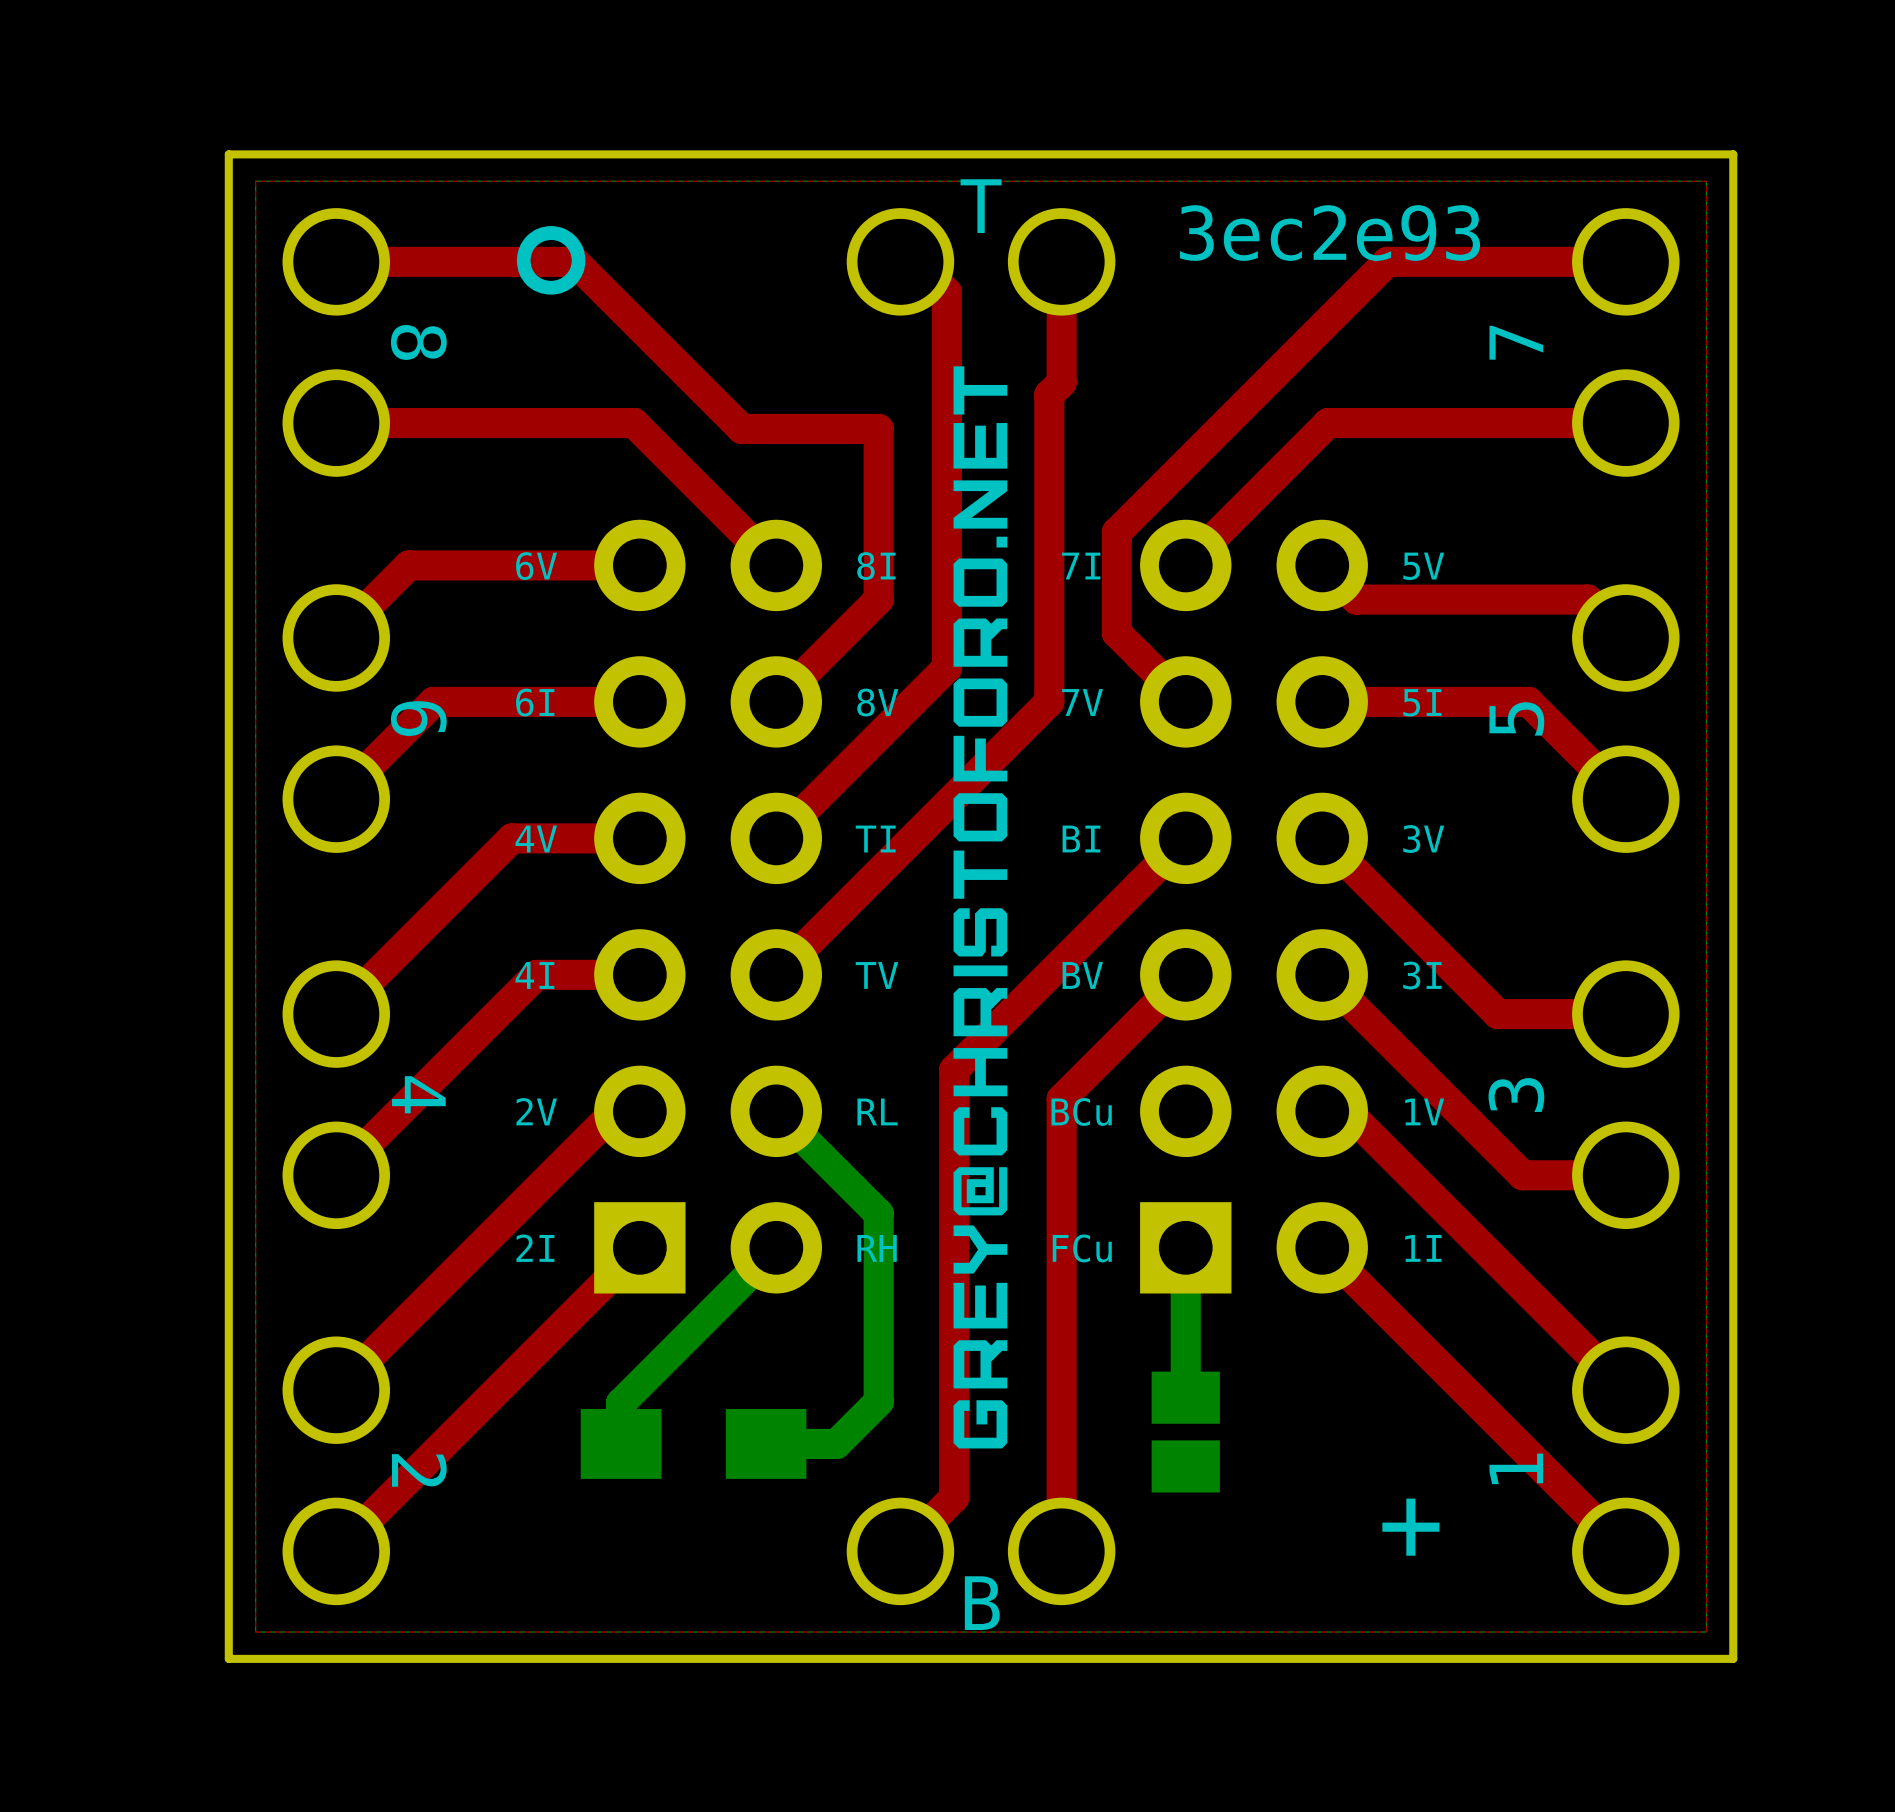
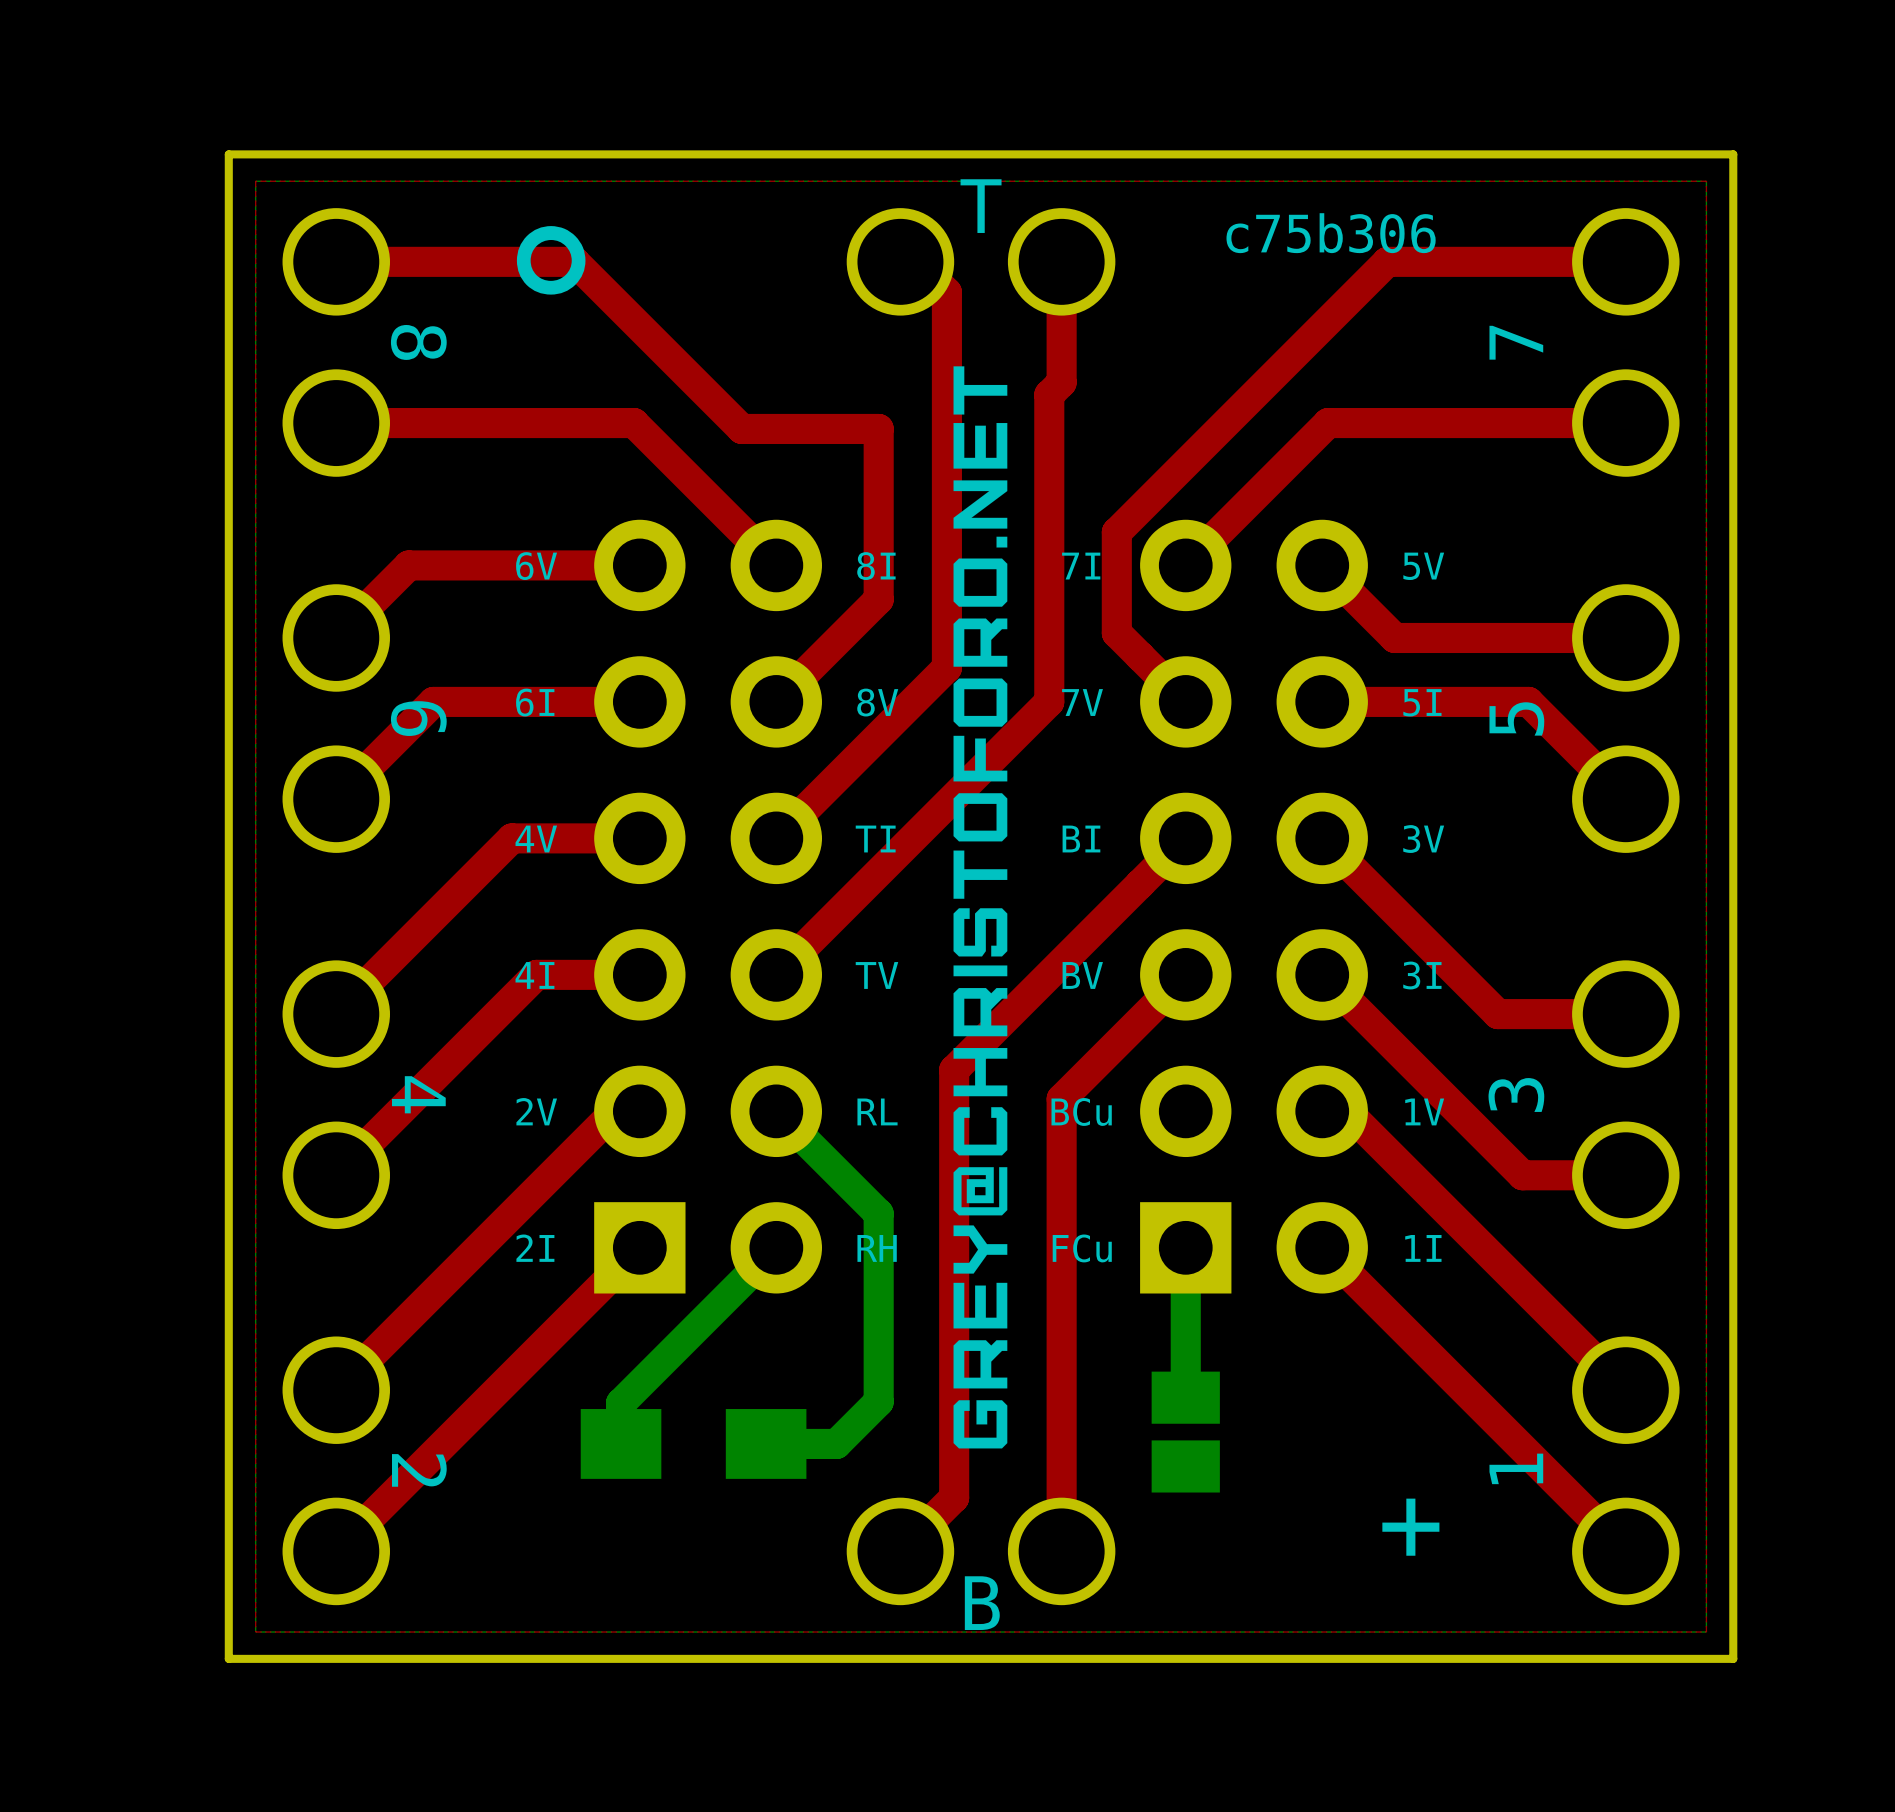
text: 3ec2e93 (1329, 233) -> c75b306 (1331, 233)
top track: (1356, 599) (1587, 599) (1625, 637) -> (1356, 599) (1394, 637) (1625, 637)

